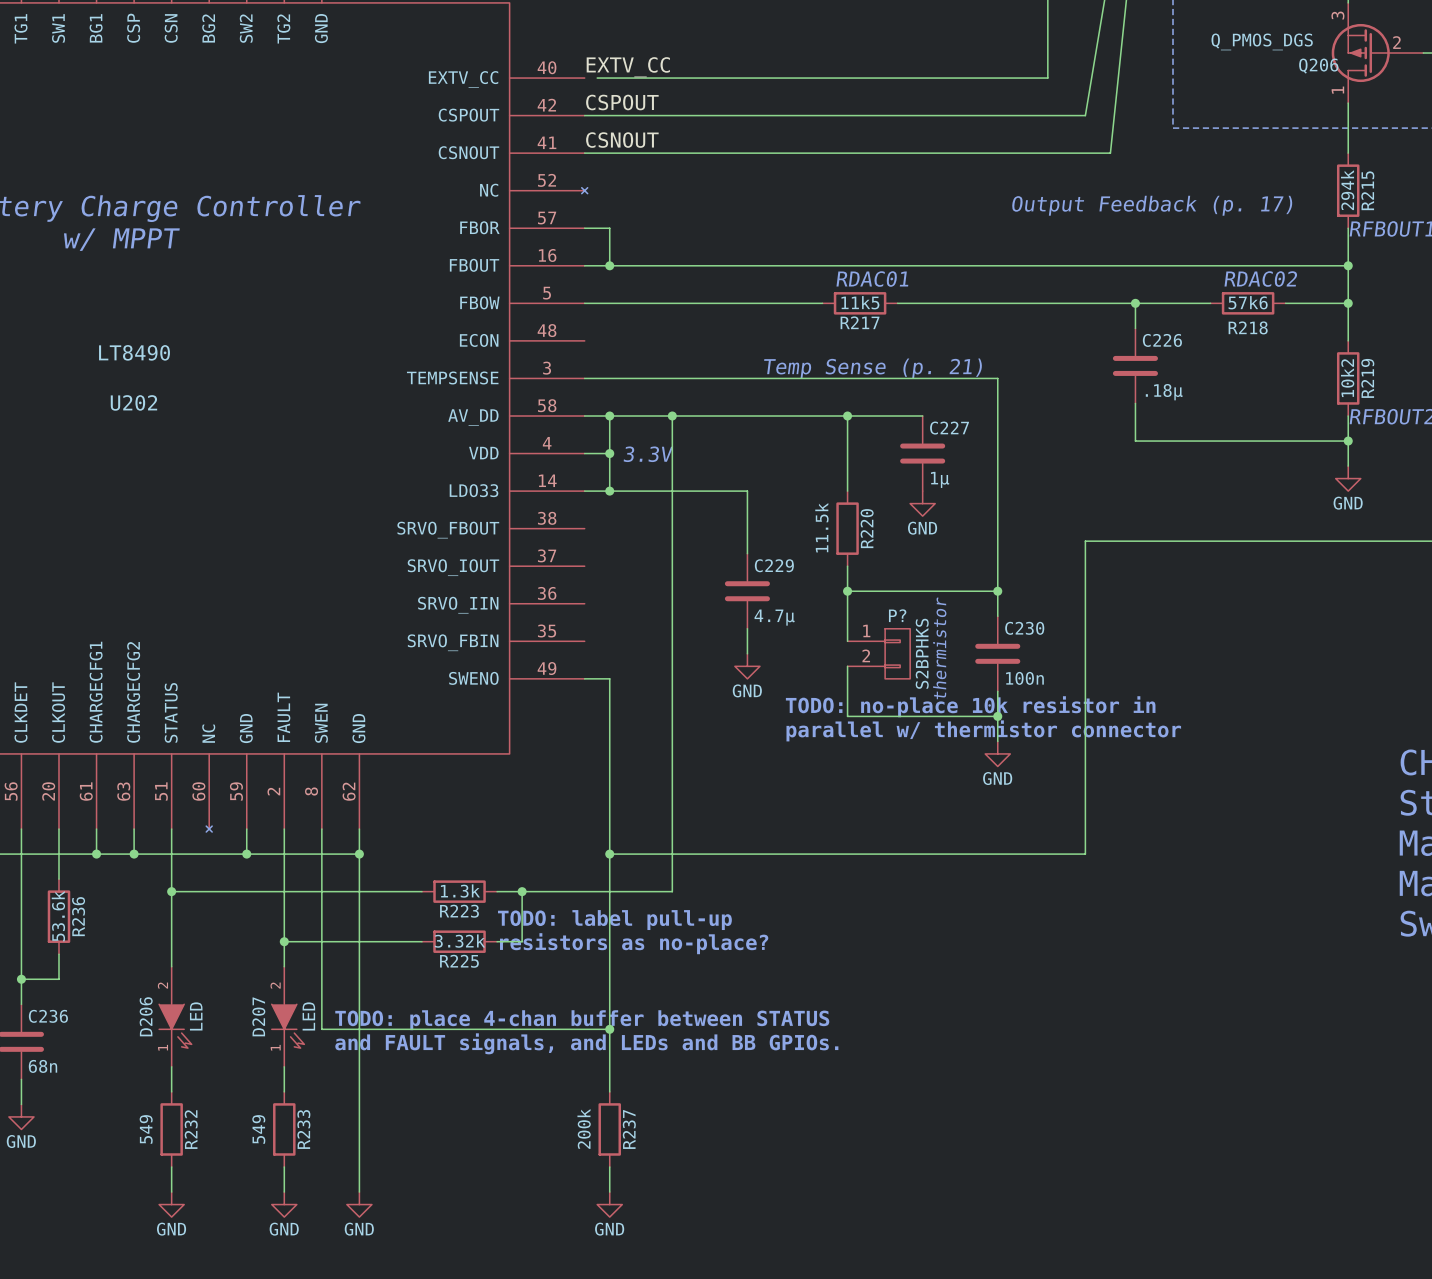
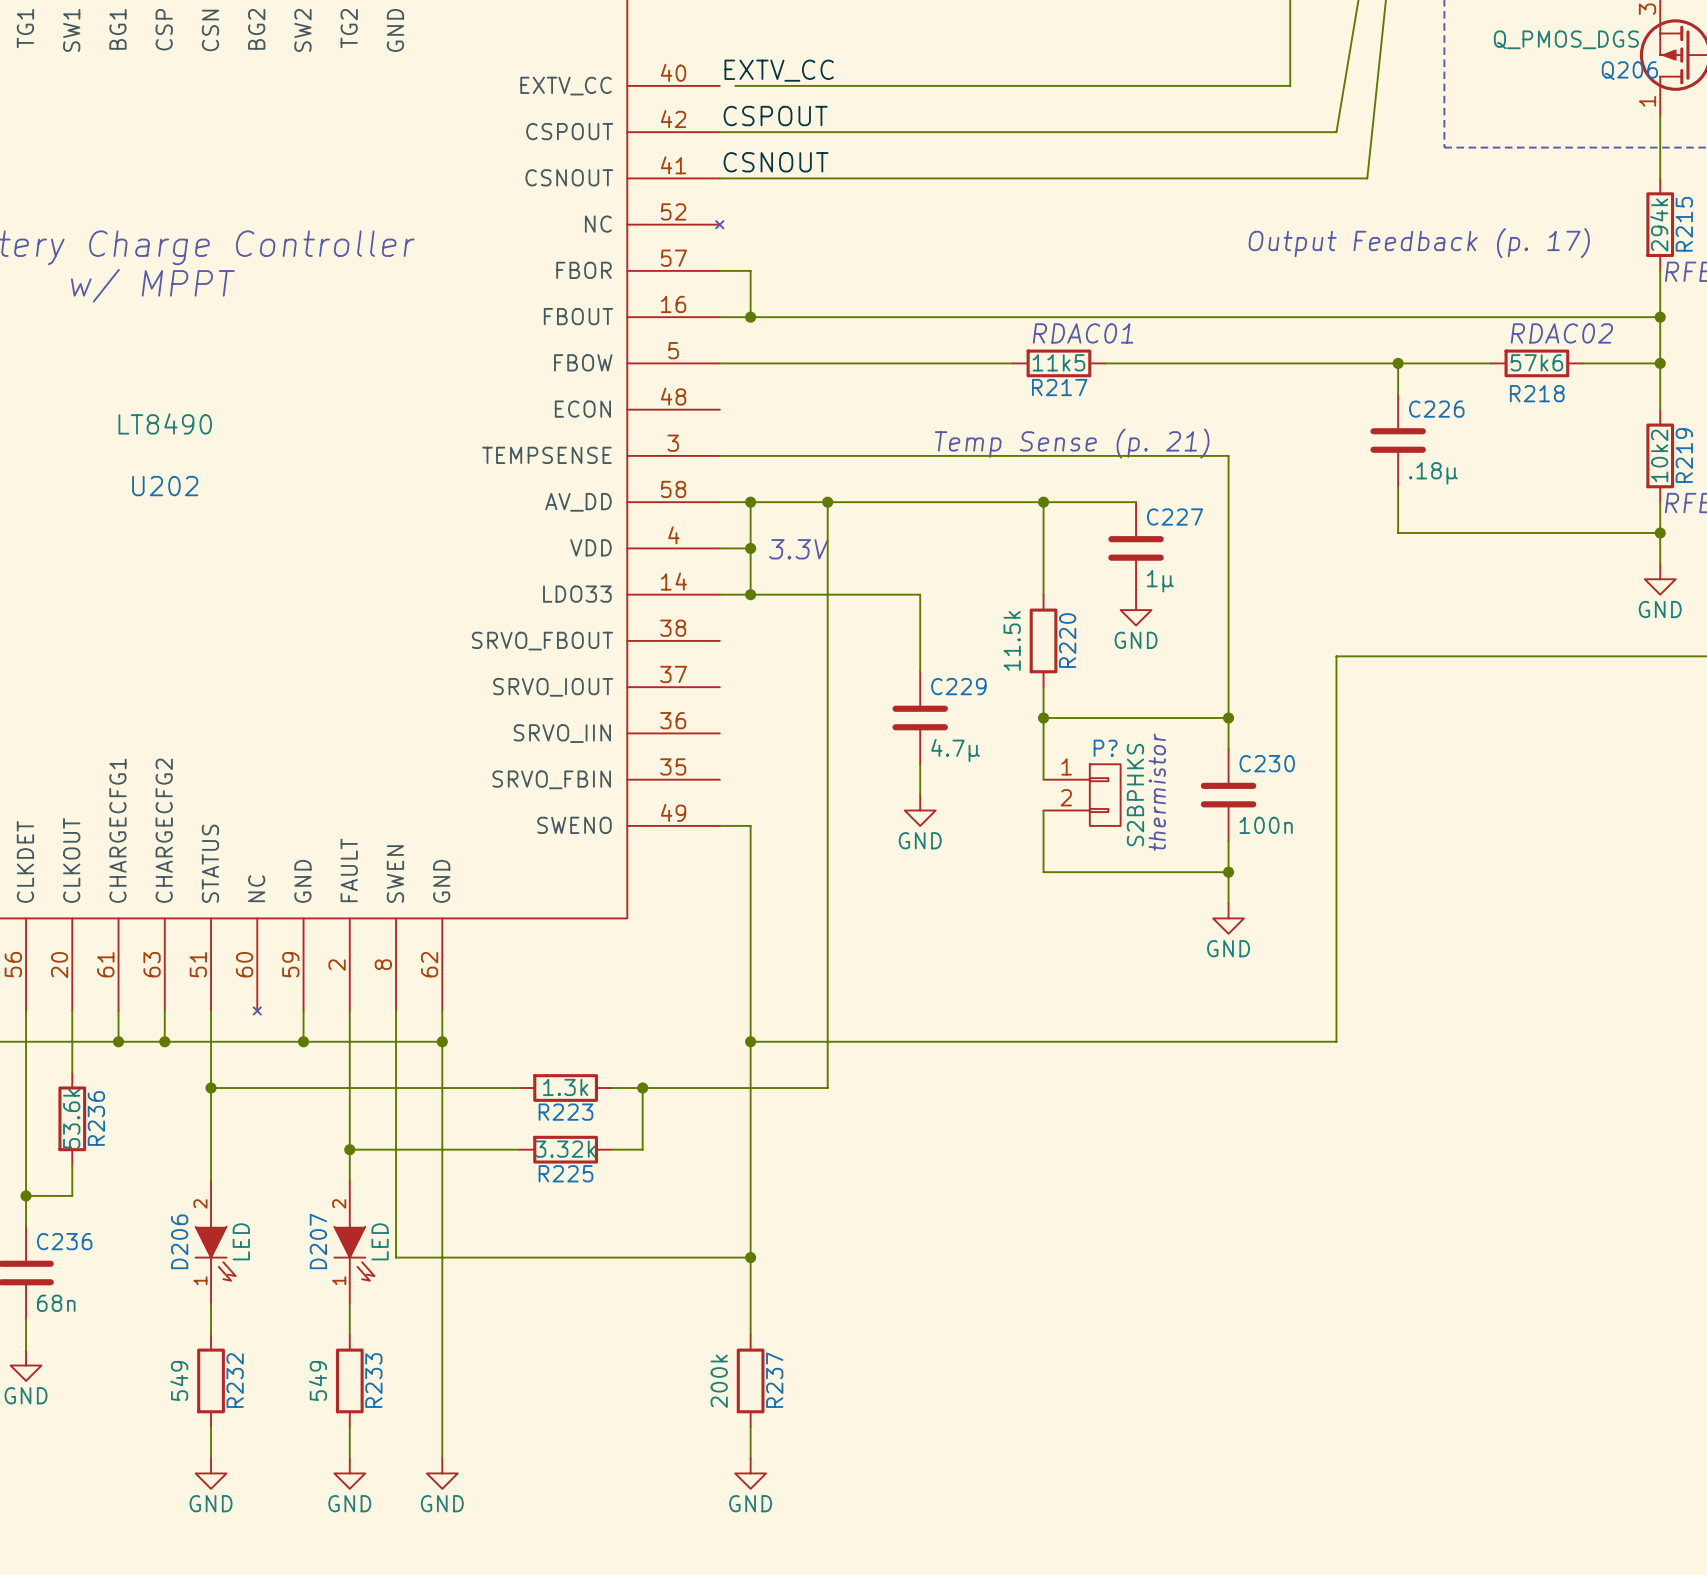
text: TODO: no-place 10k resistor in (970, 706) -> none
text: parallel w/ thermistor connector (983, 730) -> none
text: TODO: label pull-up (614, 920) -> none
text: resistors as no-place? (634, 943) -> none
text: TODO: place 4-chan buffer between STATUS (582, 1020) -> none
text: and FAULT signals, and LEDs and BB GPIOs. (586, 1043) -> none

